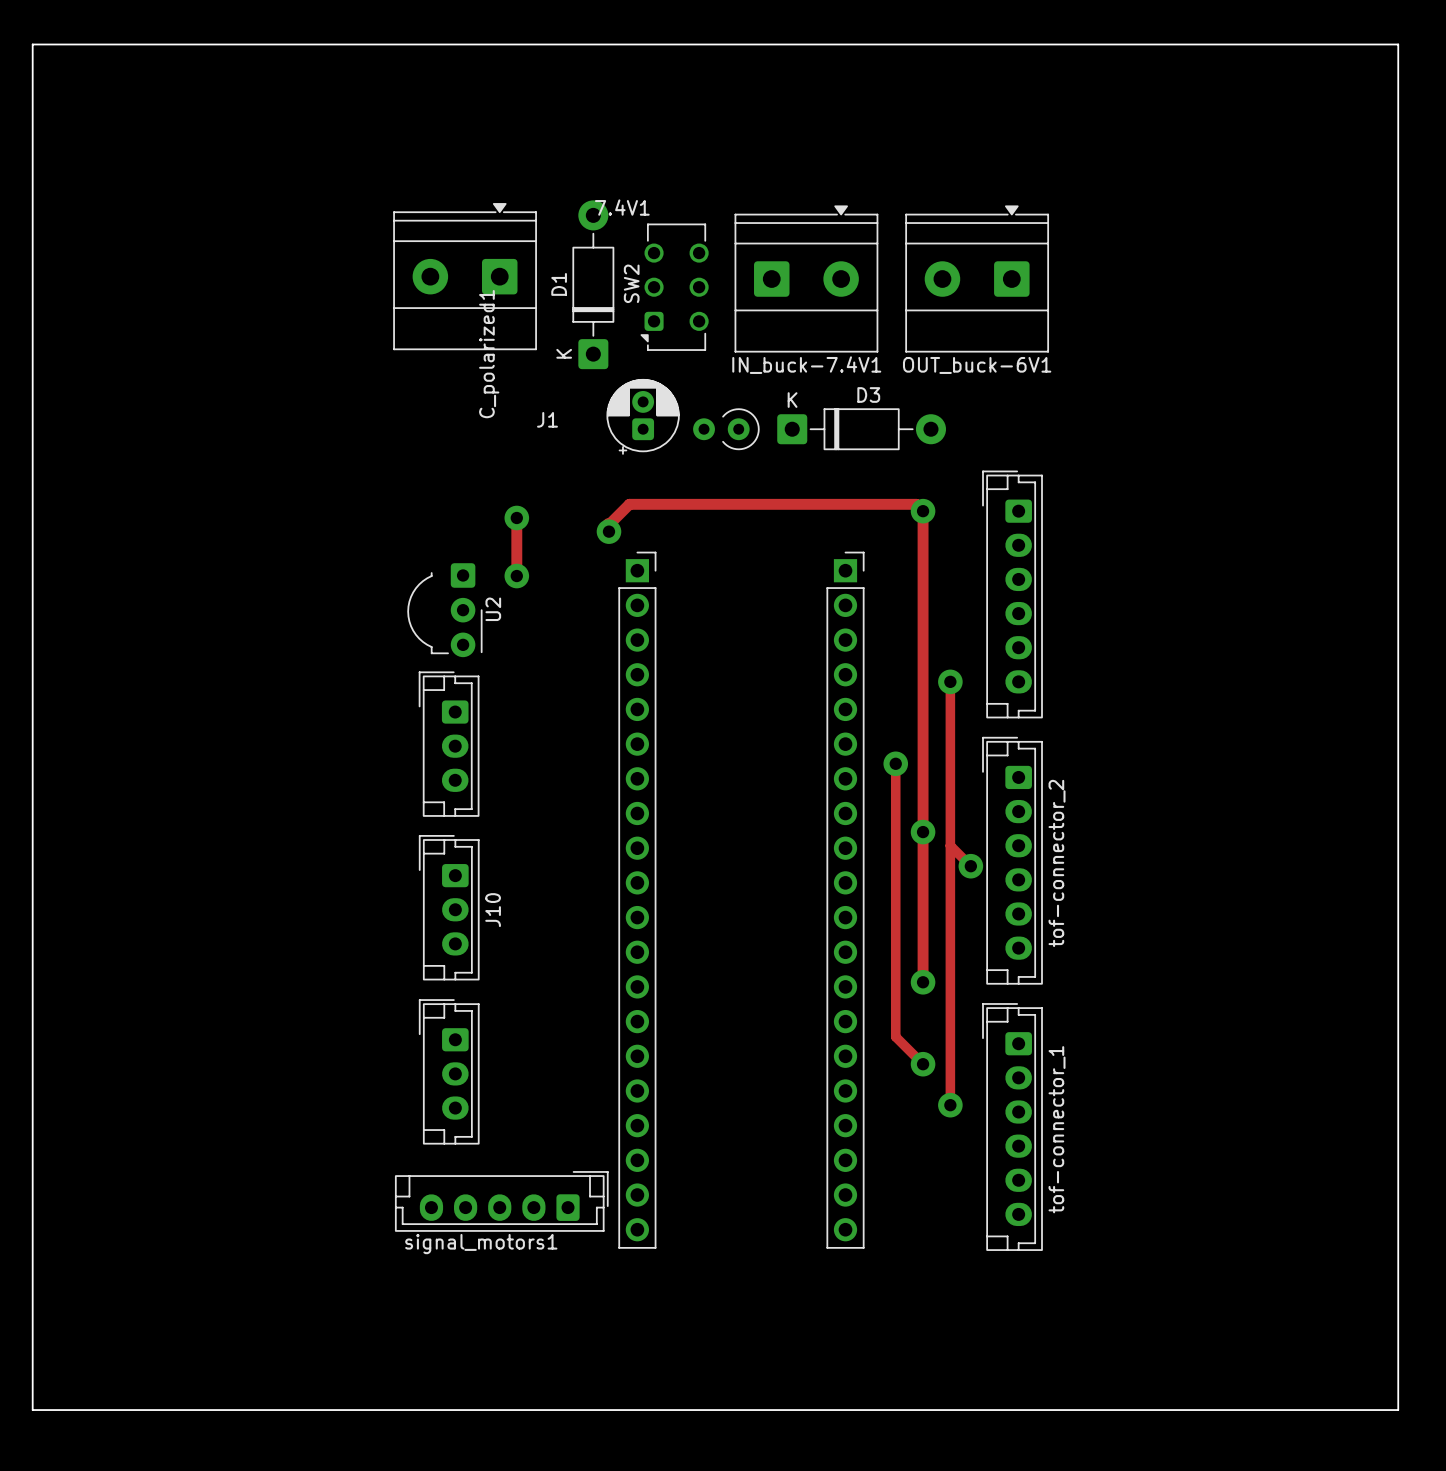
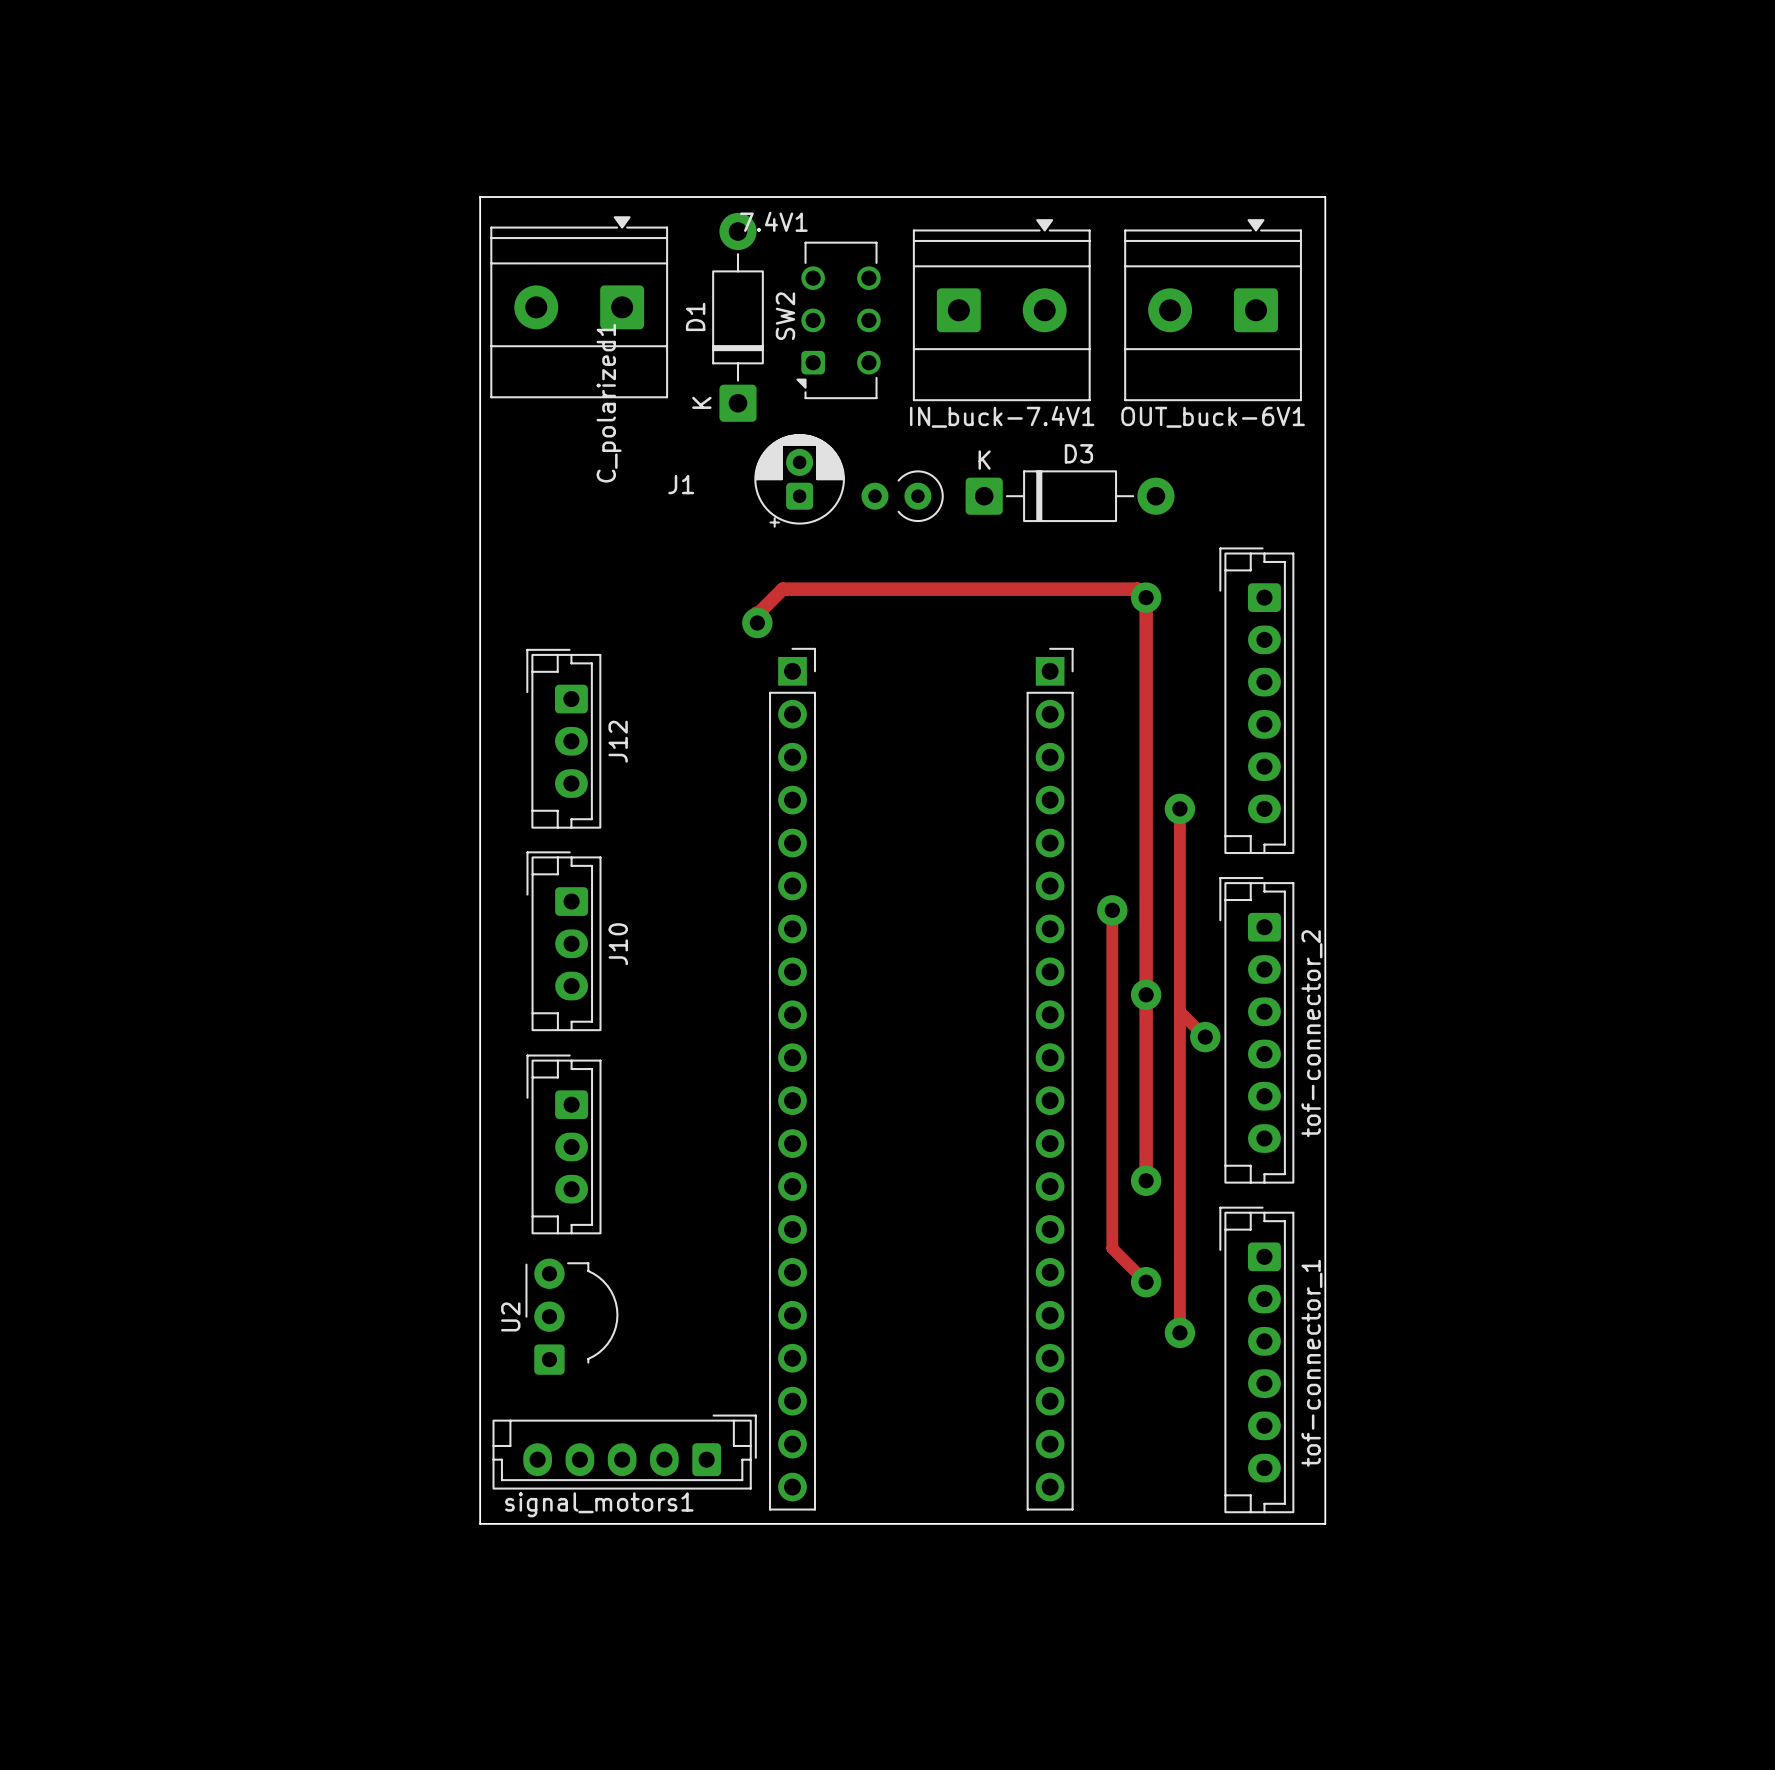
board edge: (32, 44) (1398, 44) (1398, 1410) (32, 1410) (32, 44) -> none
board edge: none -> (480, 197) (1325, 197) (1325, 1523) (480, 1523) (480, 197)
track: (516, 517) (516, 576) -> none
via: (516, 517) -> none
via: (516, 576) -> none
U2 rotation: 0° (444, 610) -> 180° (571, 1316)
U2 position: (444, 610) -> (571, 1316)
J12: none -> (563, 738)
part: (449, 744) -> none
J10 position: (449, 907) -> (563, 941)
part: none -> (563, 1144)
part: (449, 1071) -> none

